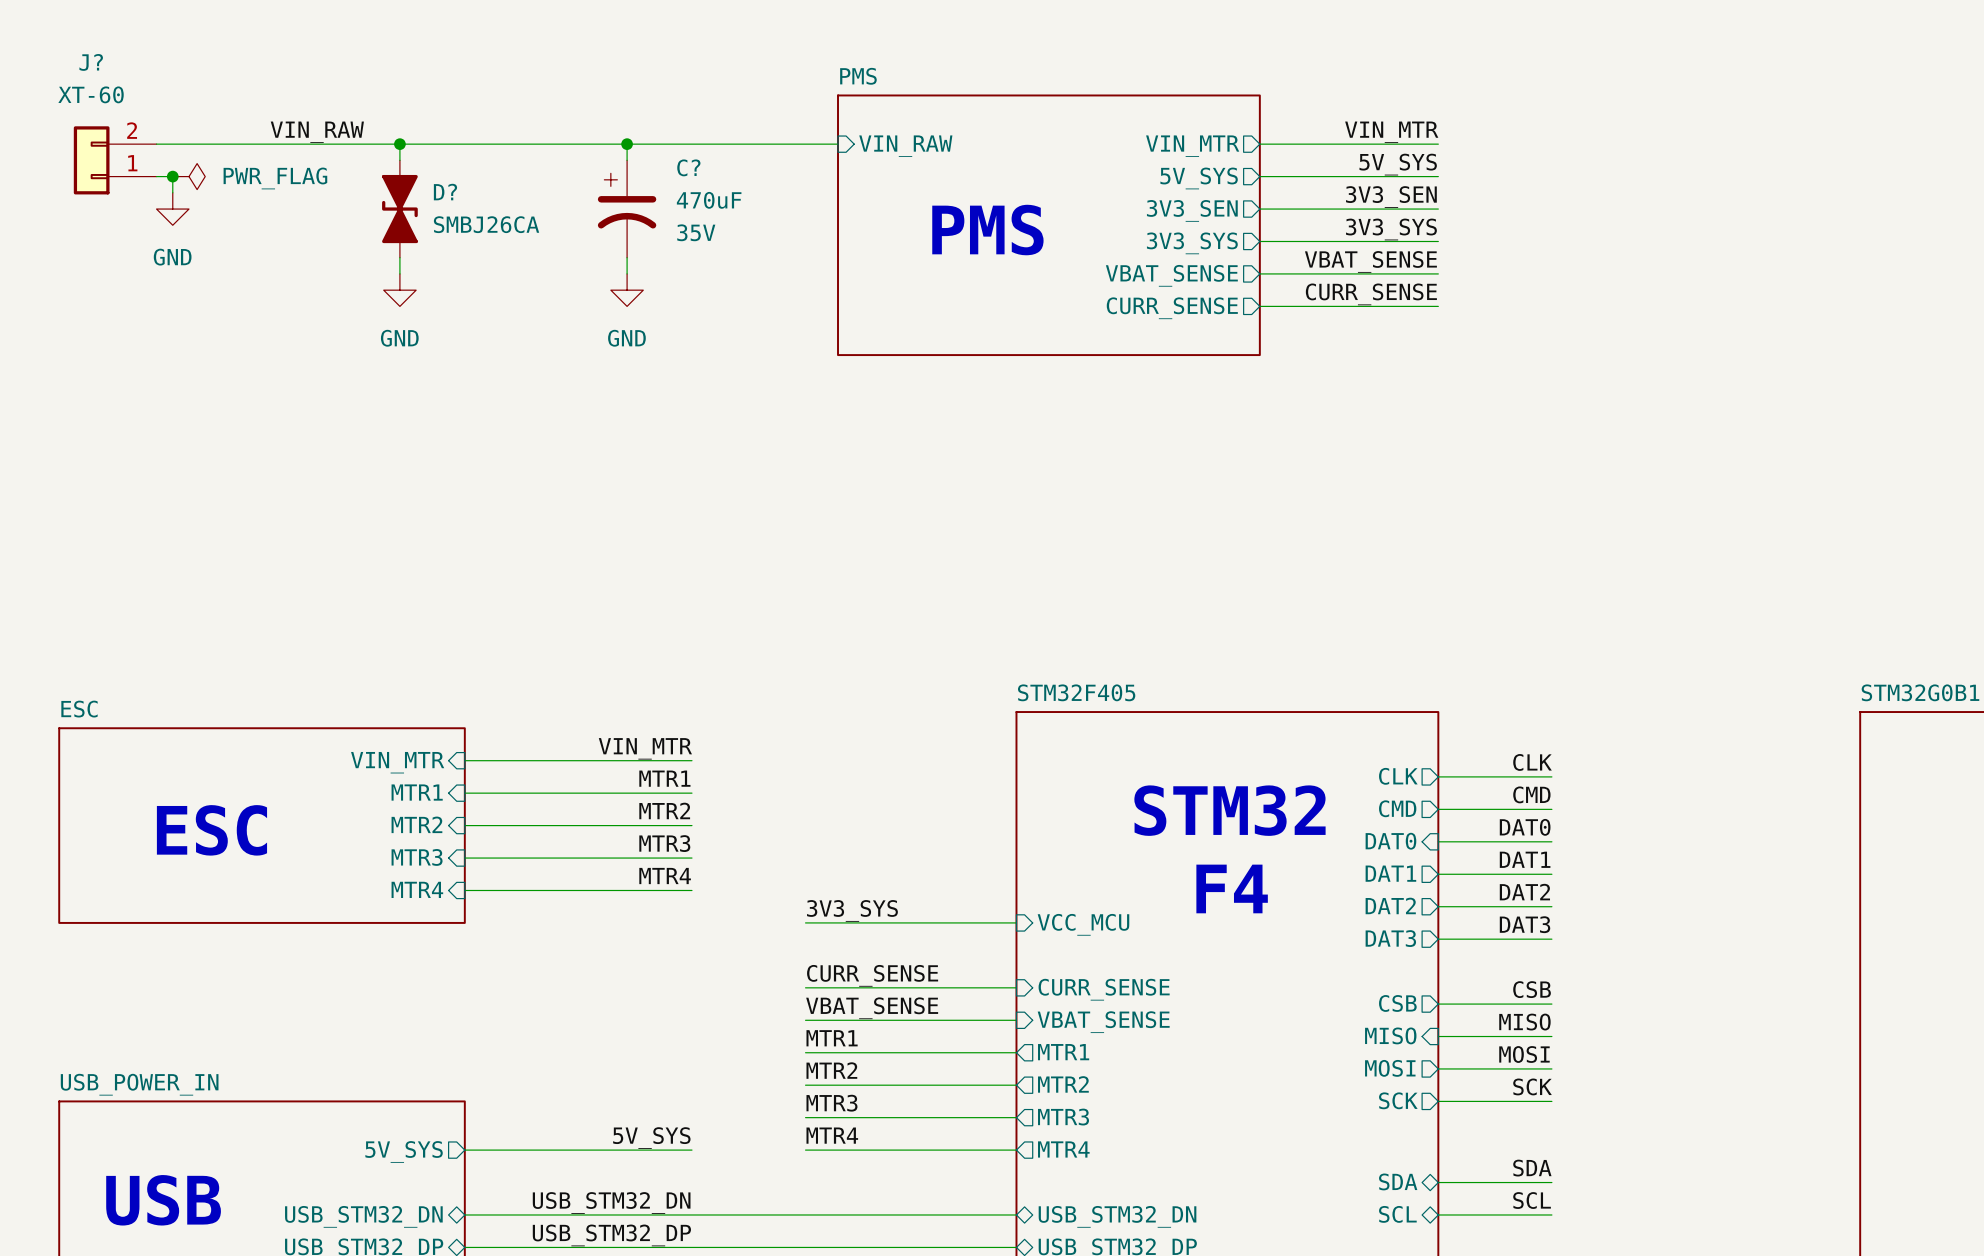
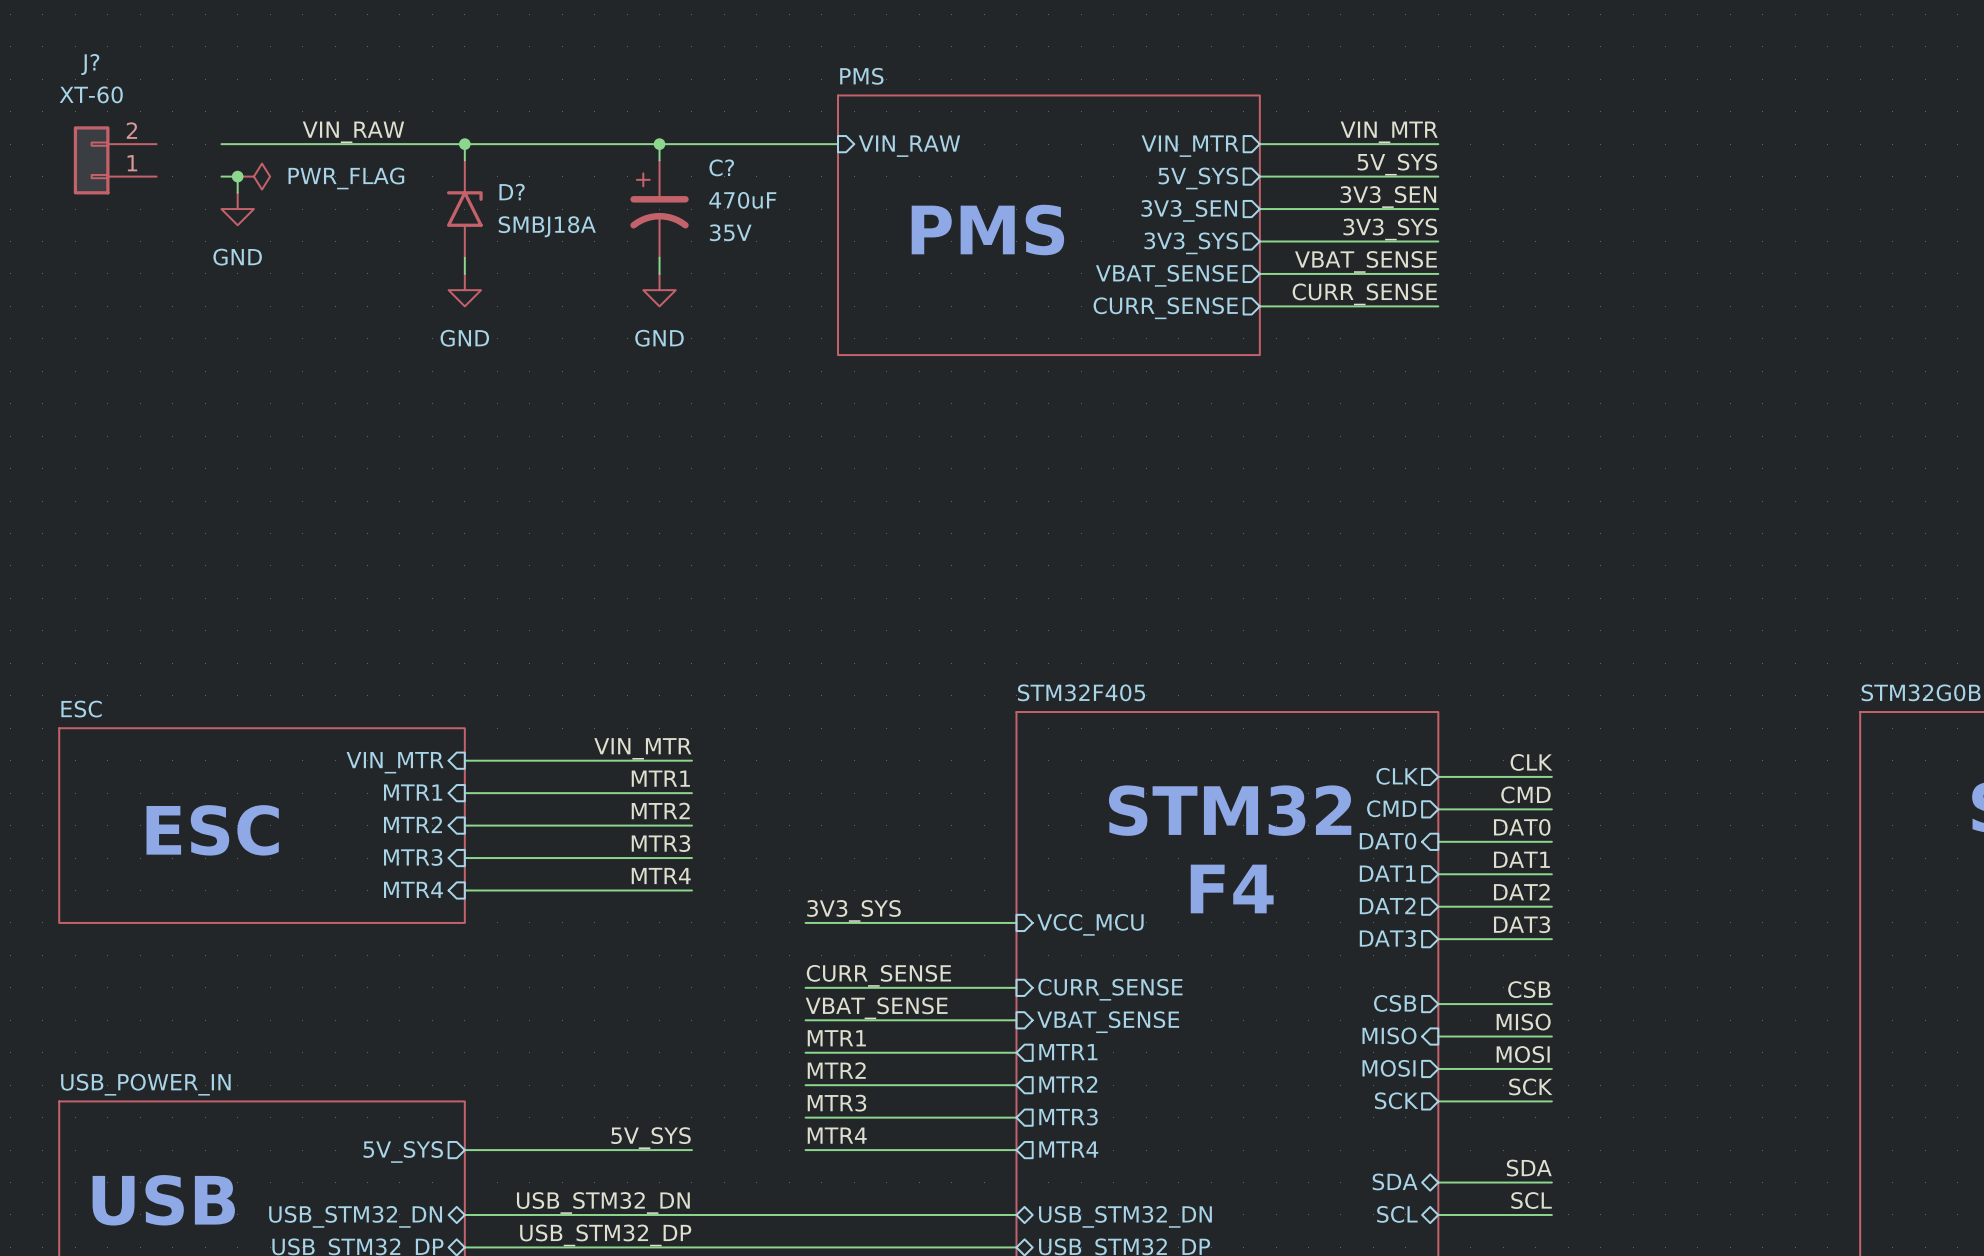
label position: VIN_RAW (317, 132) -> VIN_RAW (353, 132)
wire: (156, 144) (221, 144) -> none
wire: (399, 144) (399, 160) -> (464, 144) (464, 160)
junction position: (399, 144) -> (464, 144)
wire: (627, 144) (627, 160) -> (659, 144) (659, 160)
junction position: (627, 144) -> (659, 144)
wire: (156, 176) (172, 176) (172, 192) -> (221, 176) (237, 176) (237, 192)
junction position: (172, 176) -> (237, 176)
power symbol position: PWR_FLAG (189, 176) -> PWR_FLAG (253, 176)
power symbol position: GND (172, 209) -> GND (237, 209)
D?: SMBJ26CA (399, 209) -> none
D?: none -> SMBJ18A (464, 209)
C? position: (627, 209) -> (659, 209)
wire: (399, 257) (399, 273) -> (464, 257) (464, 273)
wire: (627, 257) (627, 273) -> (659, 257) (659, 273)
power symbol position: GND (399, 290) -> GND (464, 290)
power symbol position: GND (627, 290) -> GND (659, 290)

